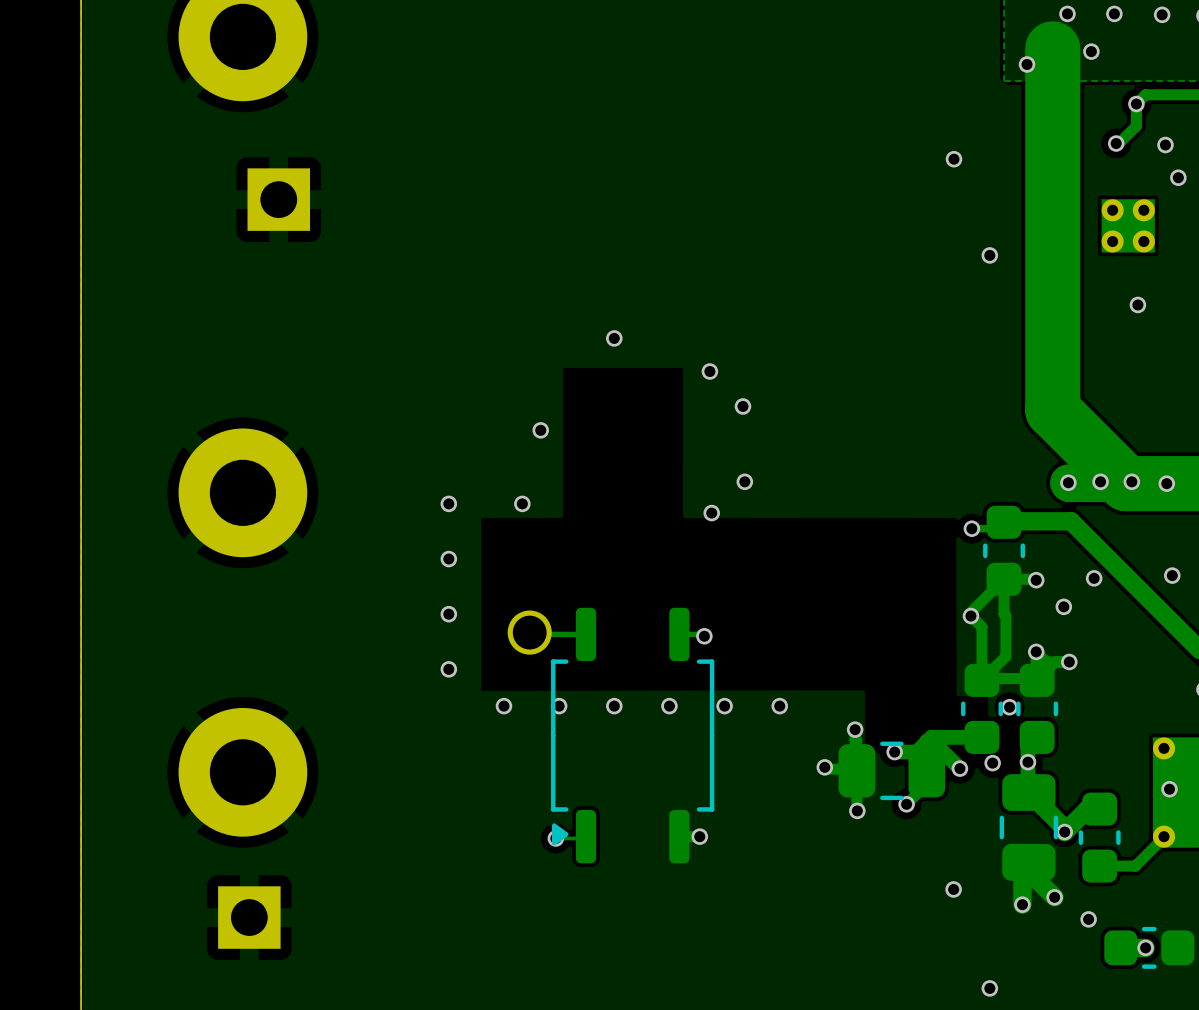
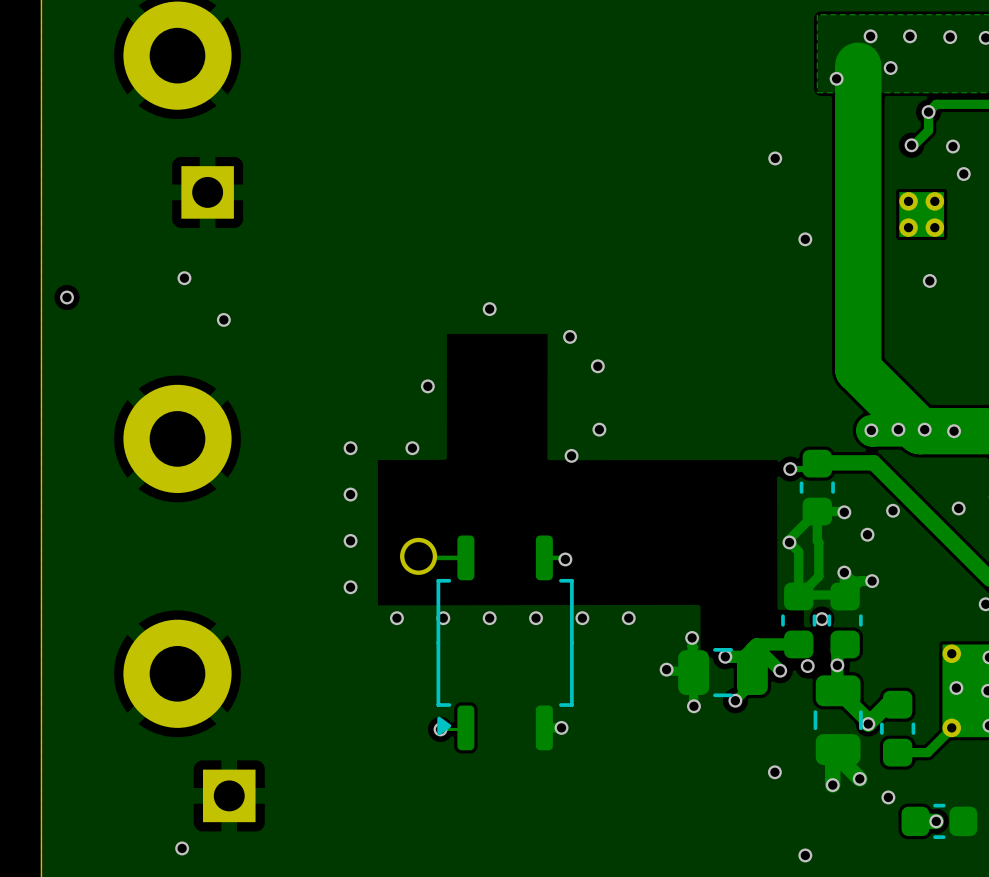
via: none -> (184, 278)
via: none -> (67, 297)
via: none -> (223, 319)
part position: (249, 917) -> (229, 795)
via: none -> (182, 848)

